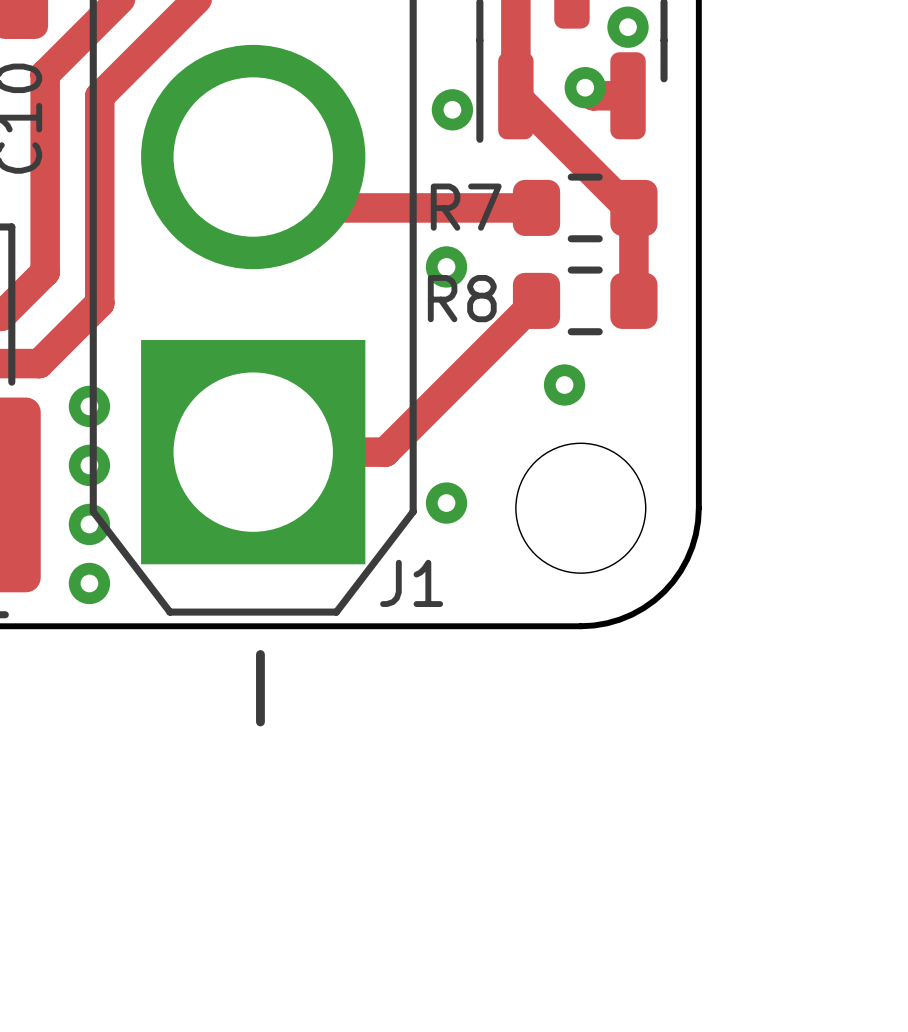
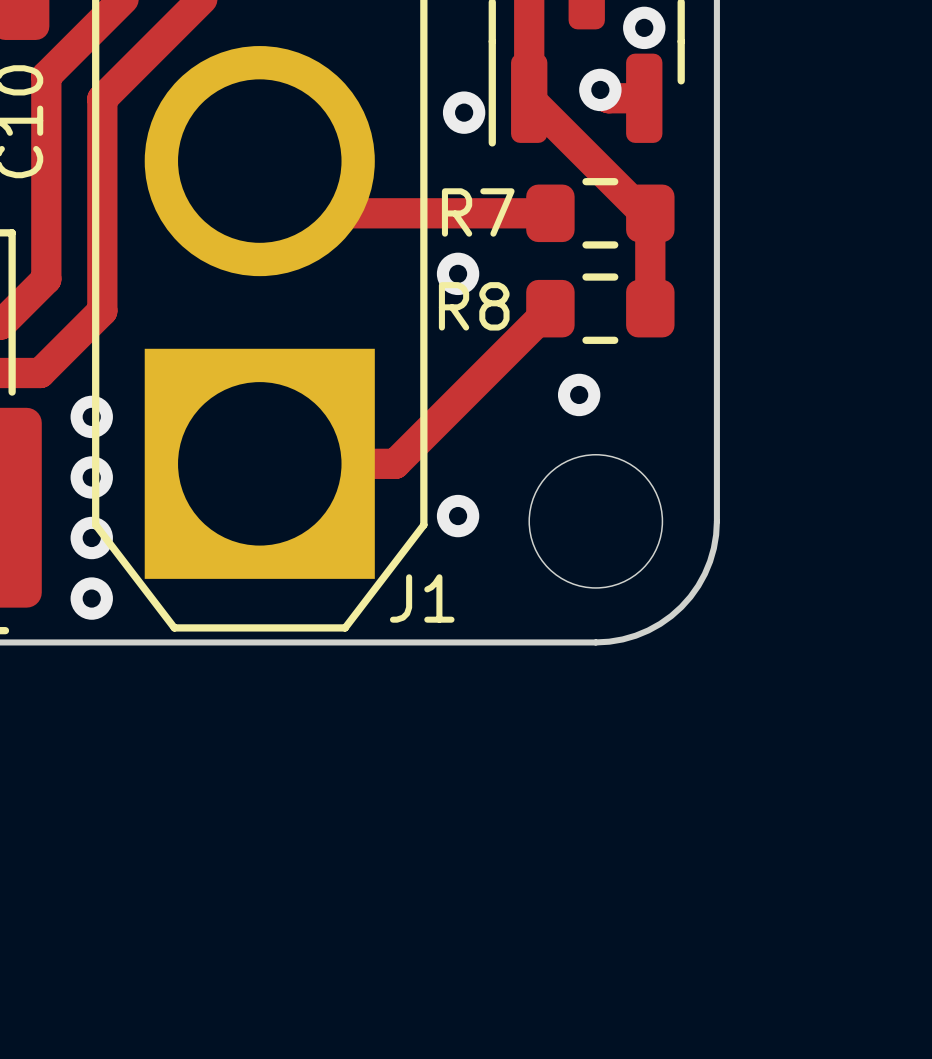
J1 text: - (260, 688) -> none

